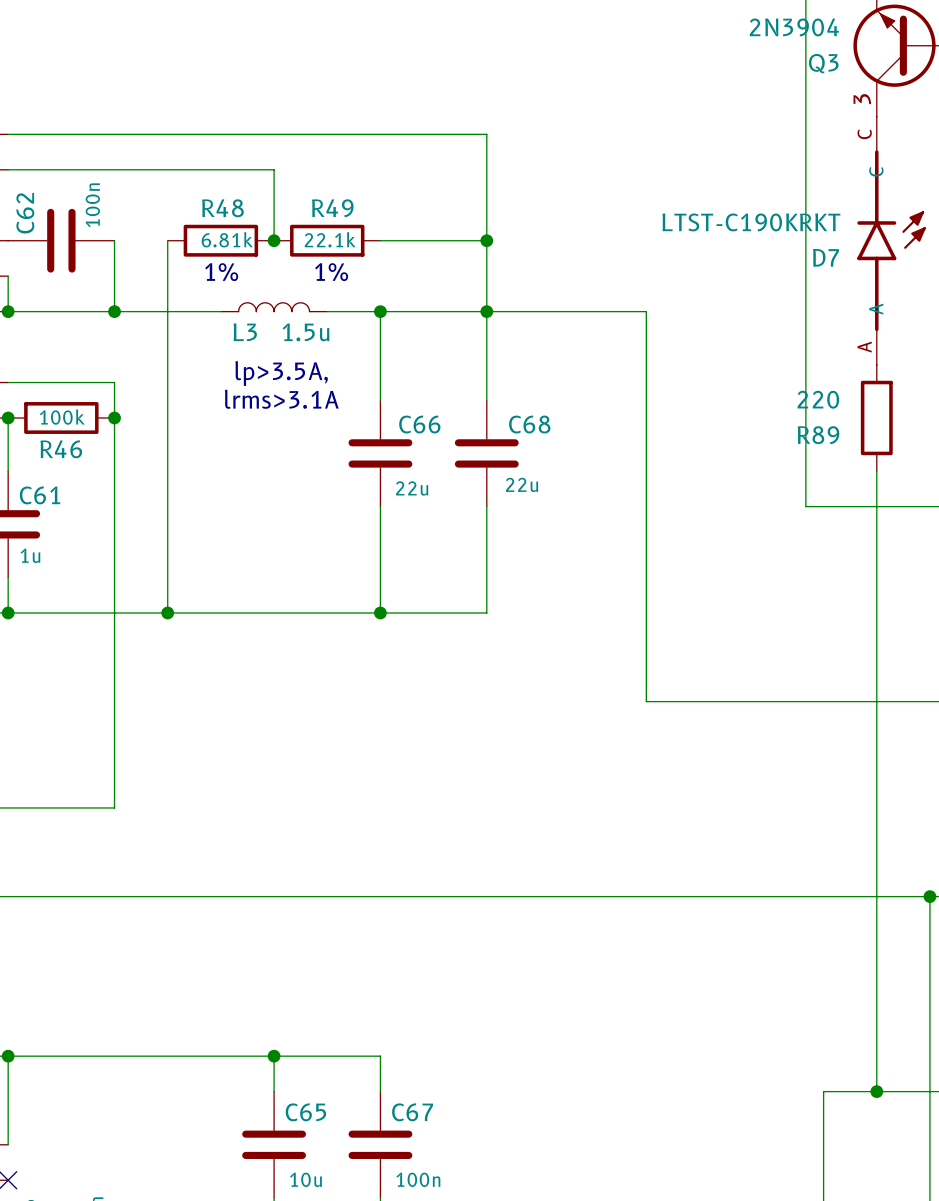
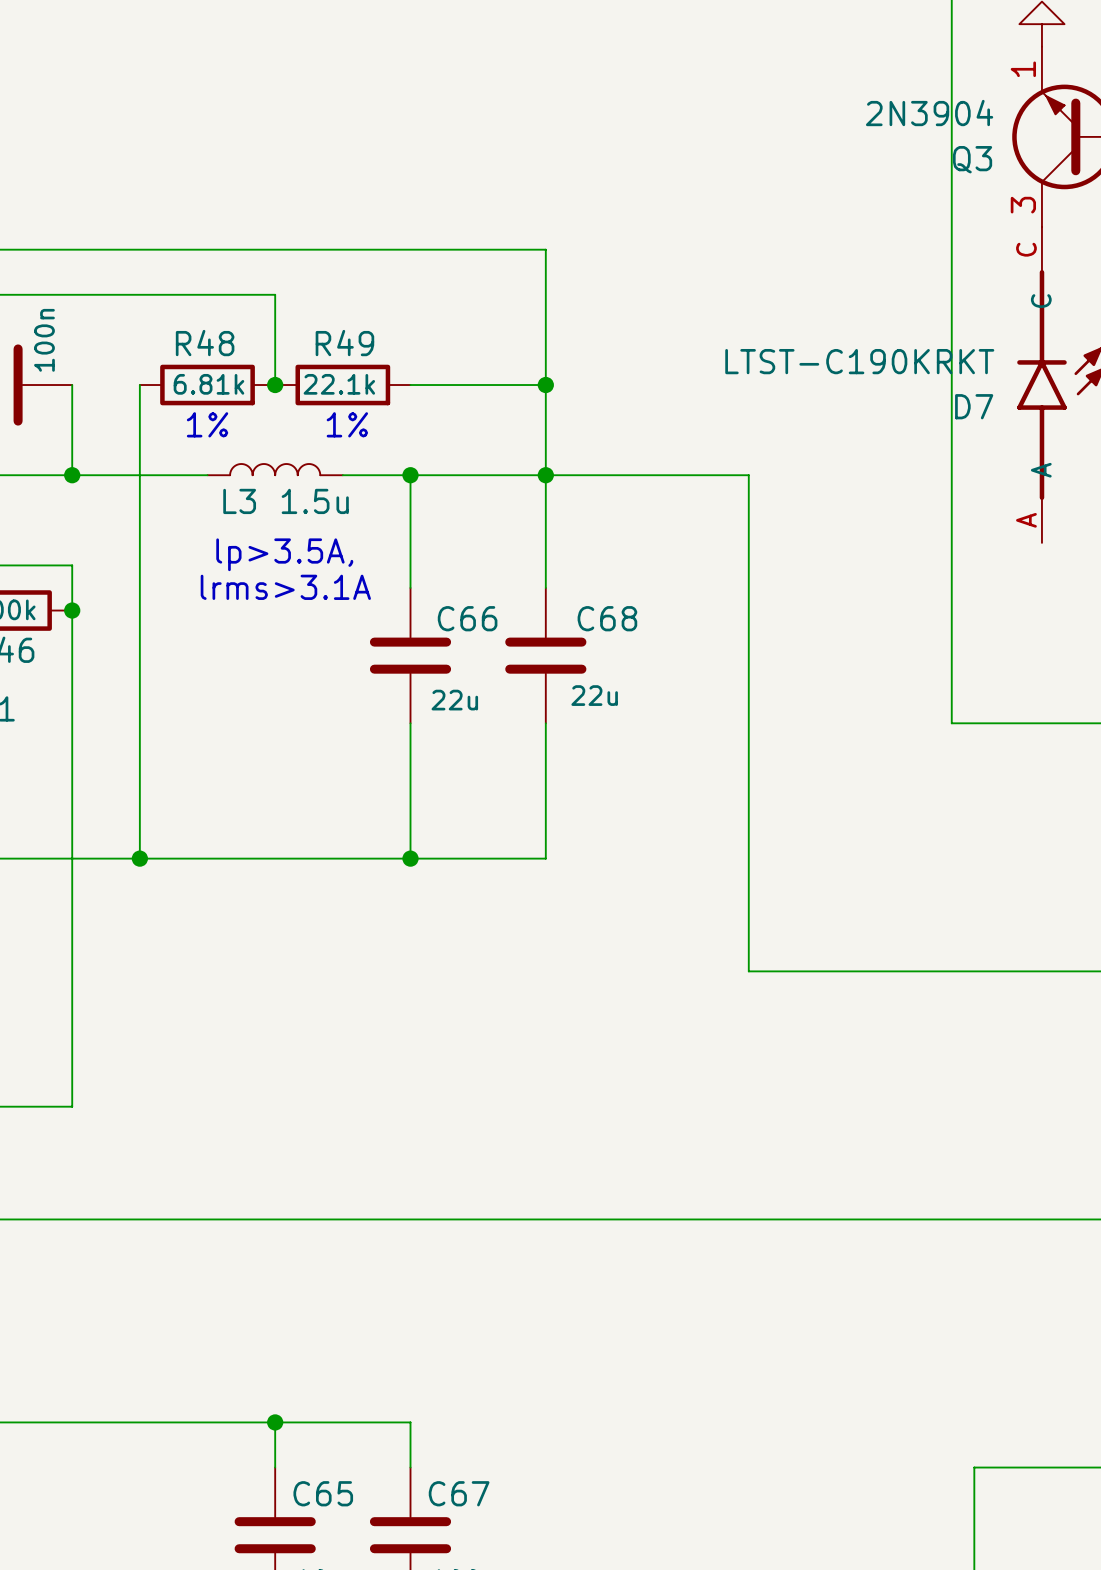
R89: 220 (876, 417) -> none
wire: (876, 471) (876, 1091) -> none
junction: (876, 1091) -> none

